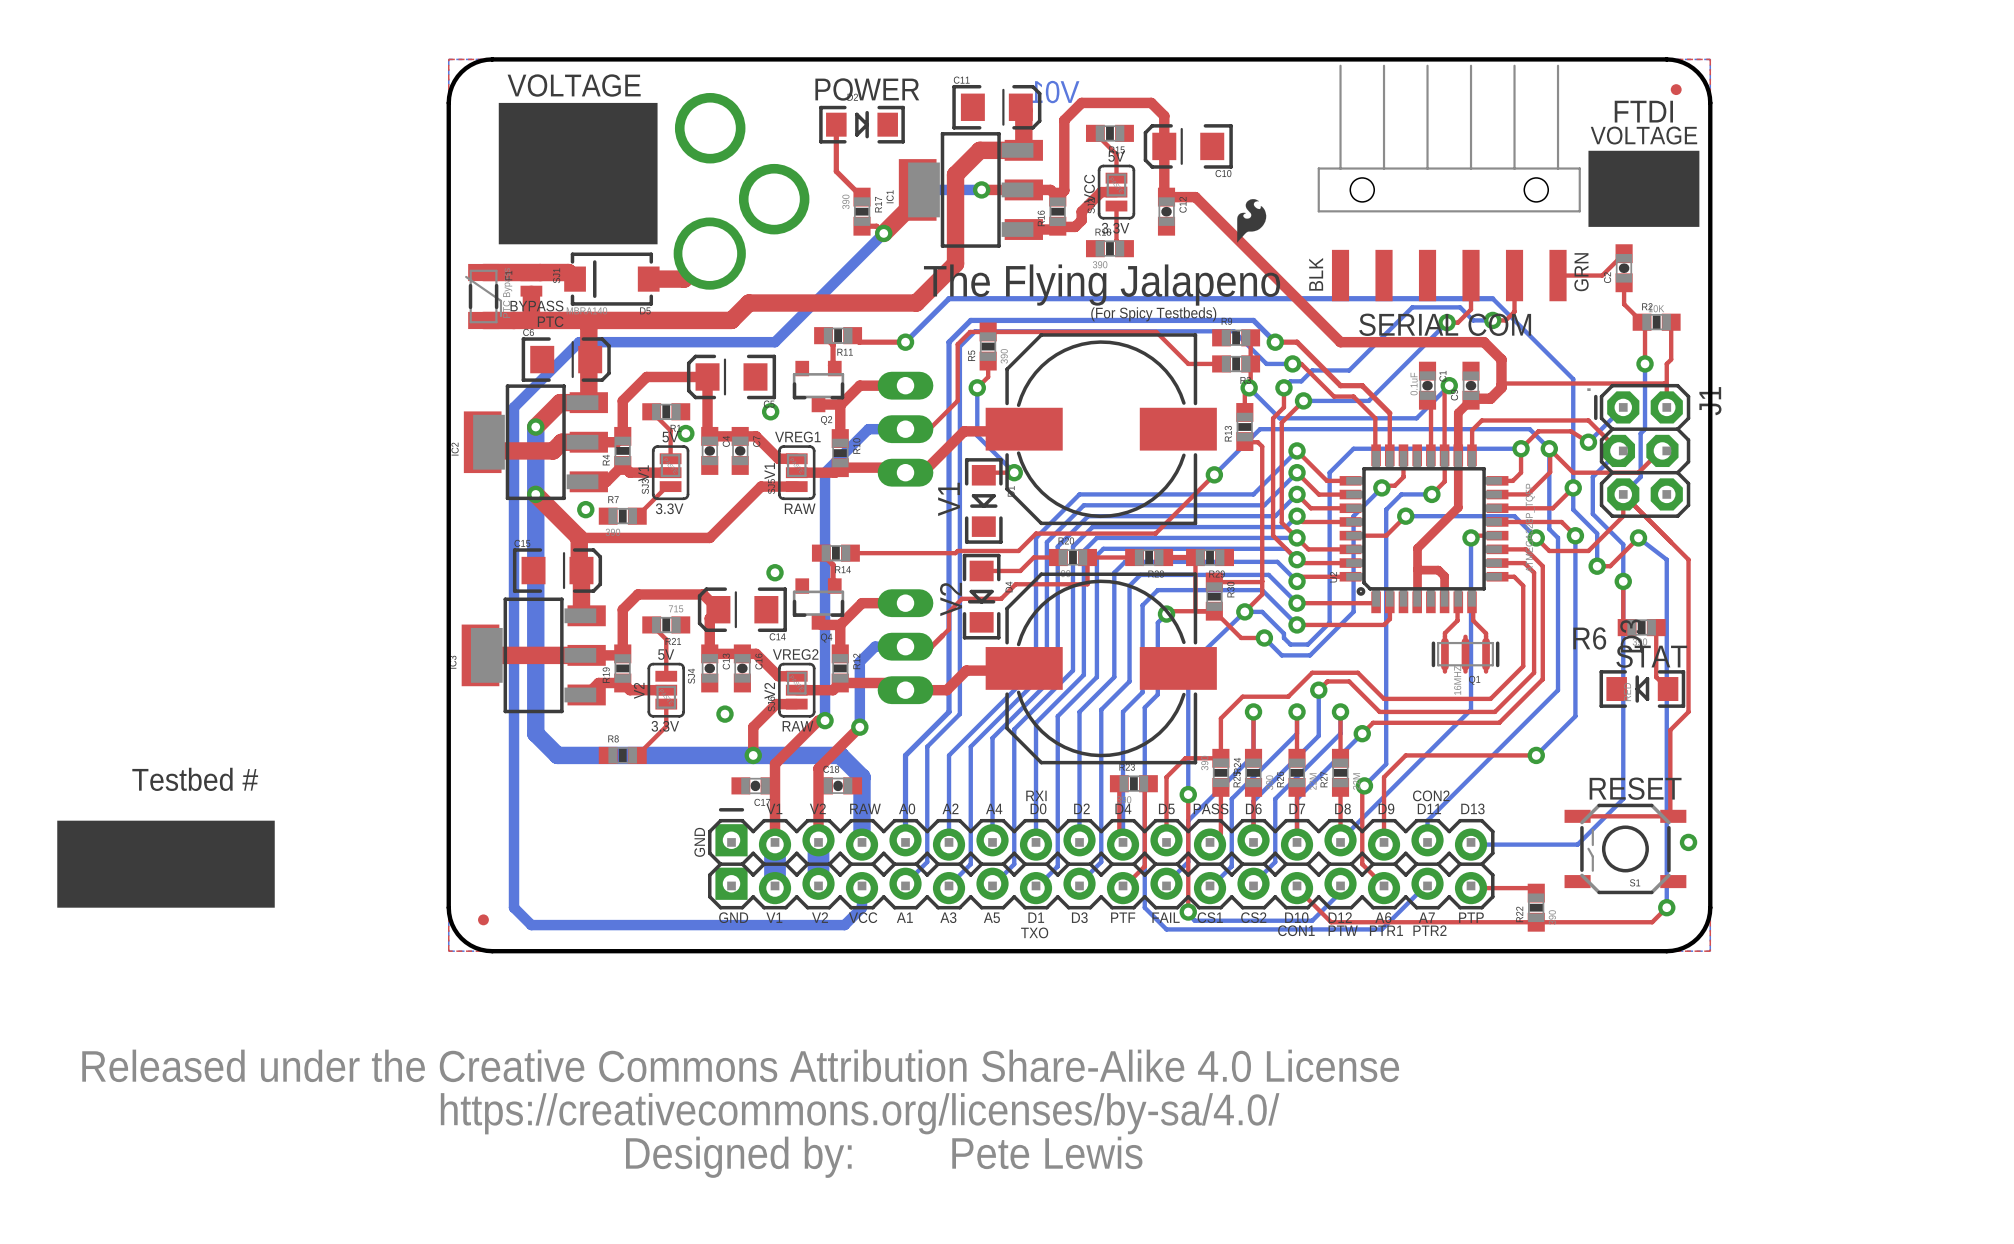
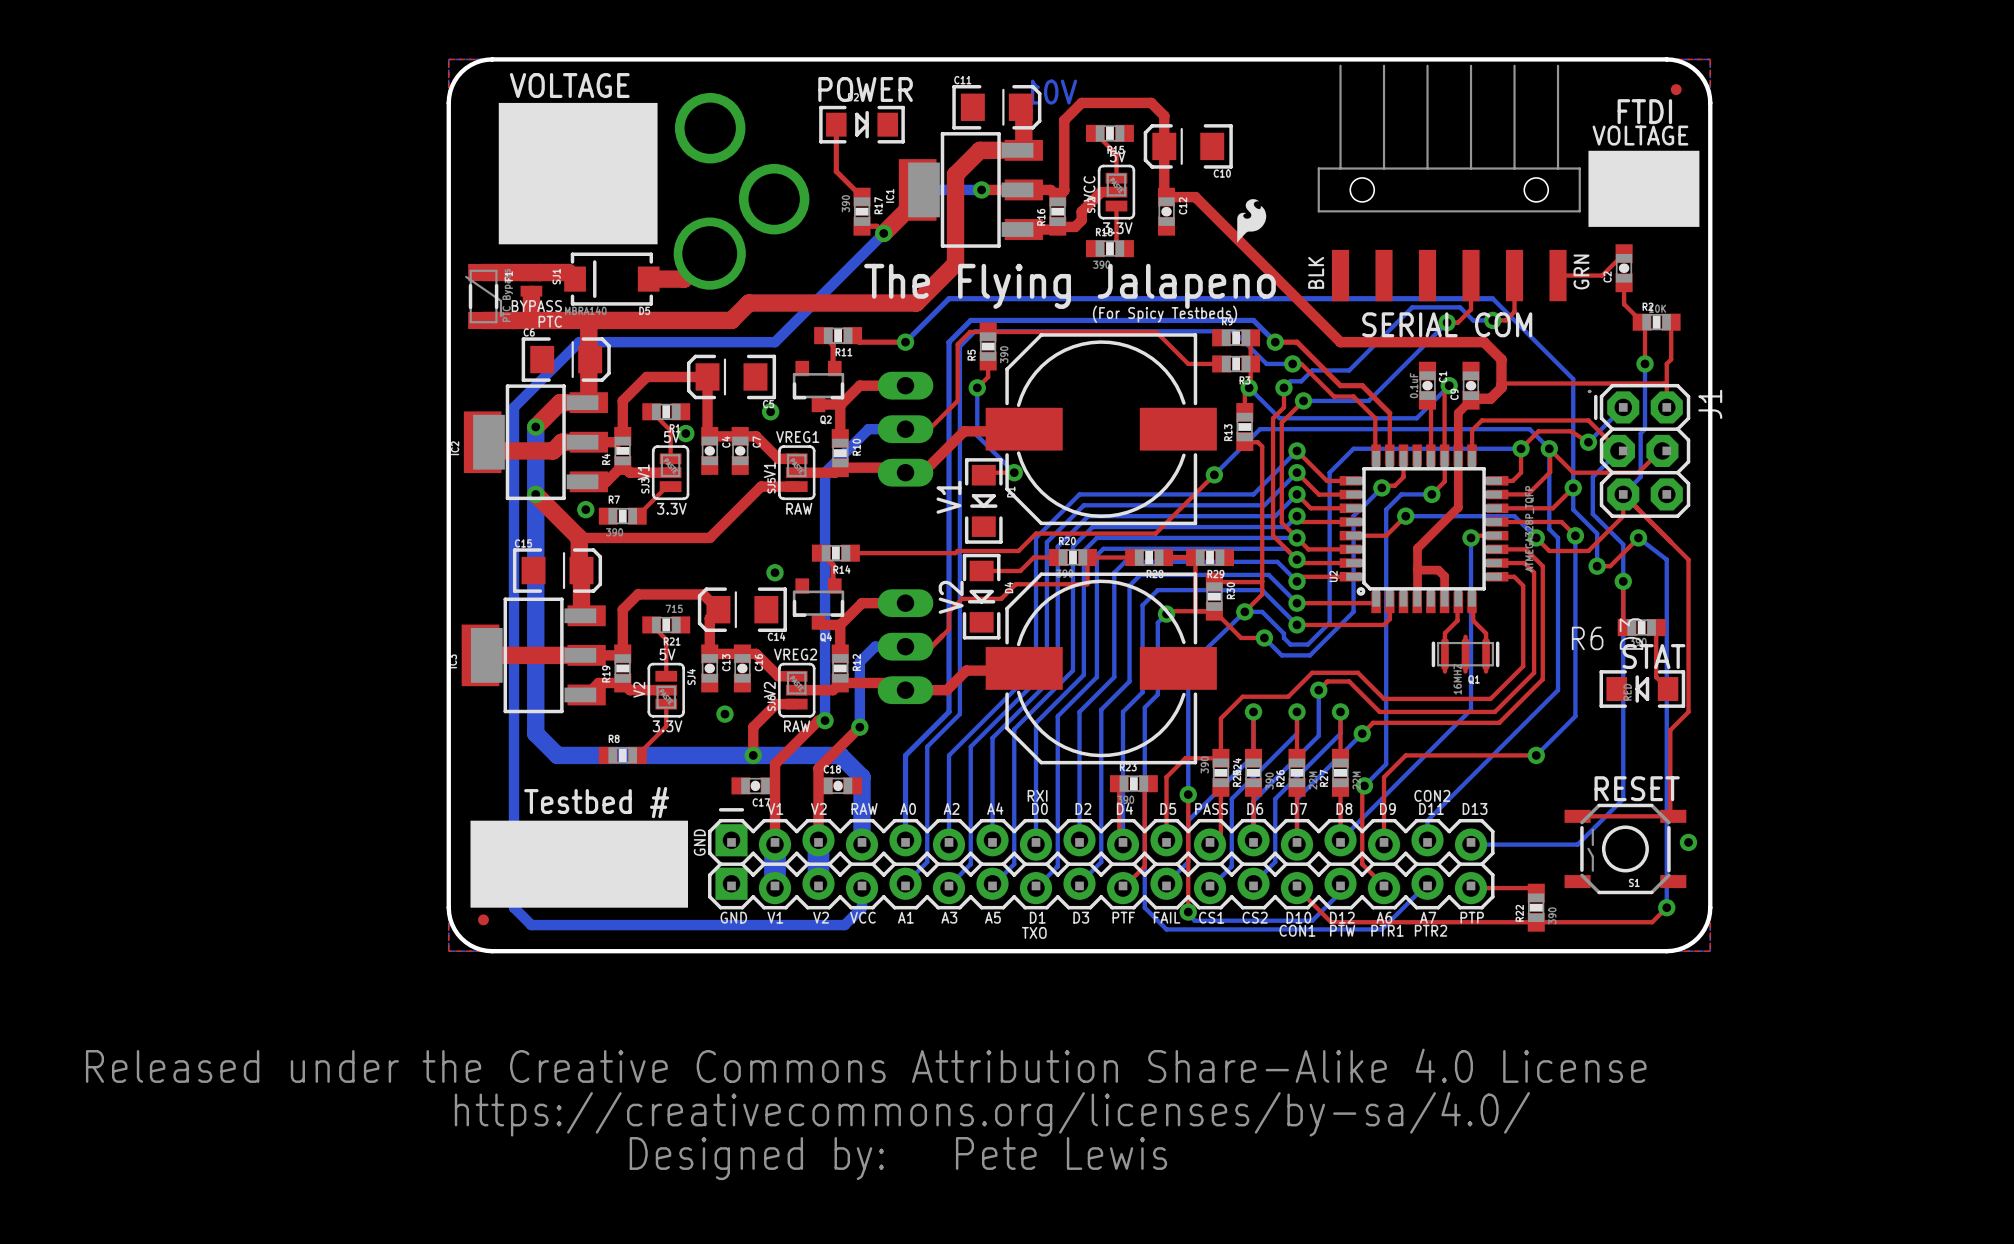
text position: Testbed # (195, 779) -> Testbed # (596, 802)
drawing position: (166, 864) -> (579, 864)

